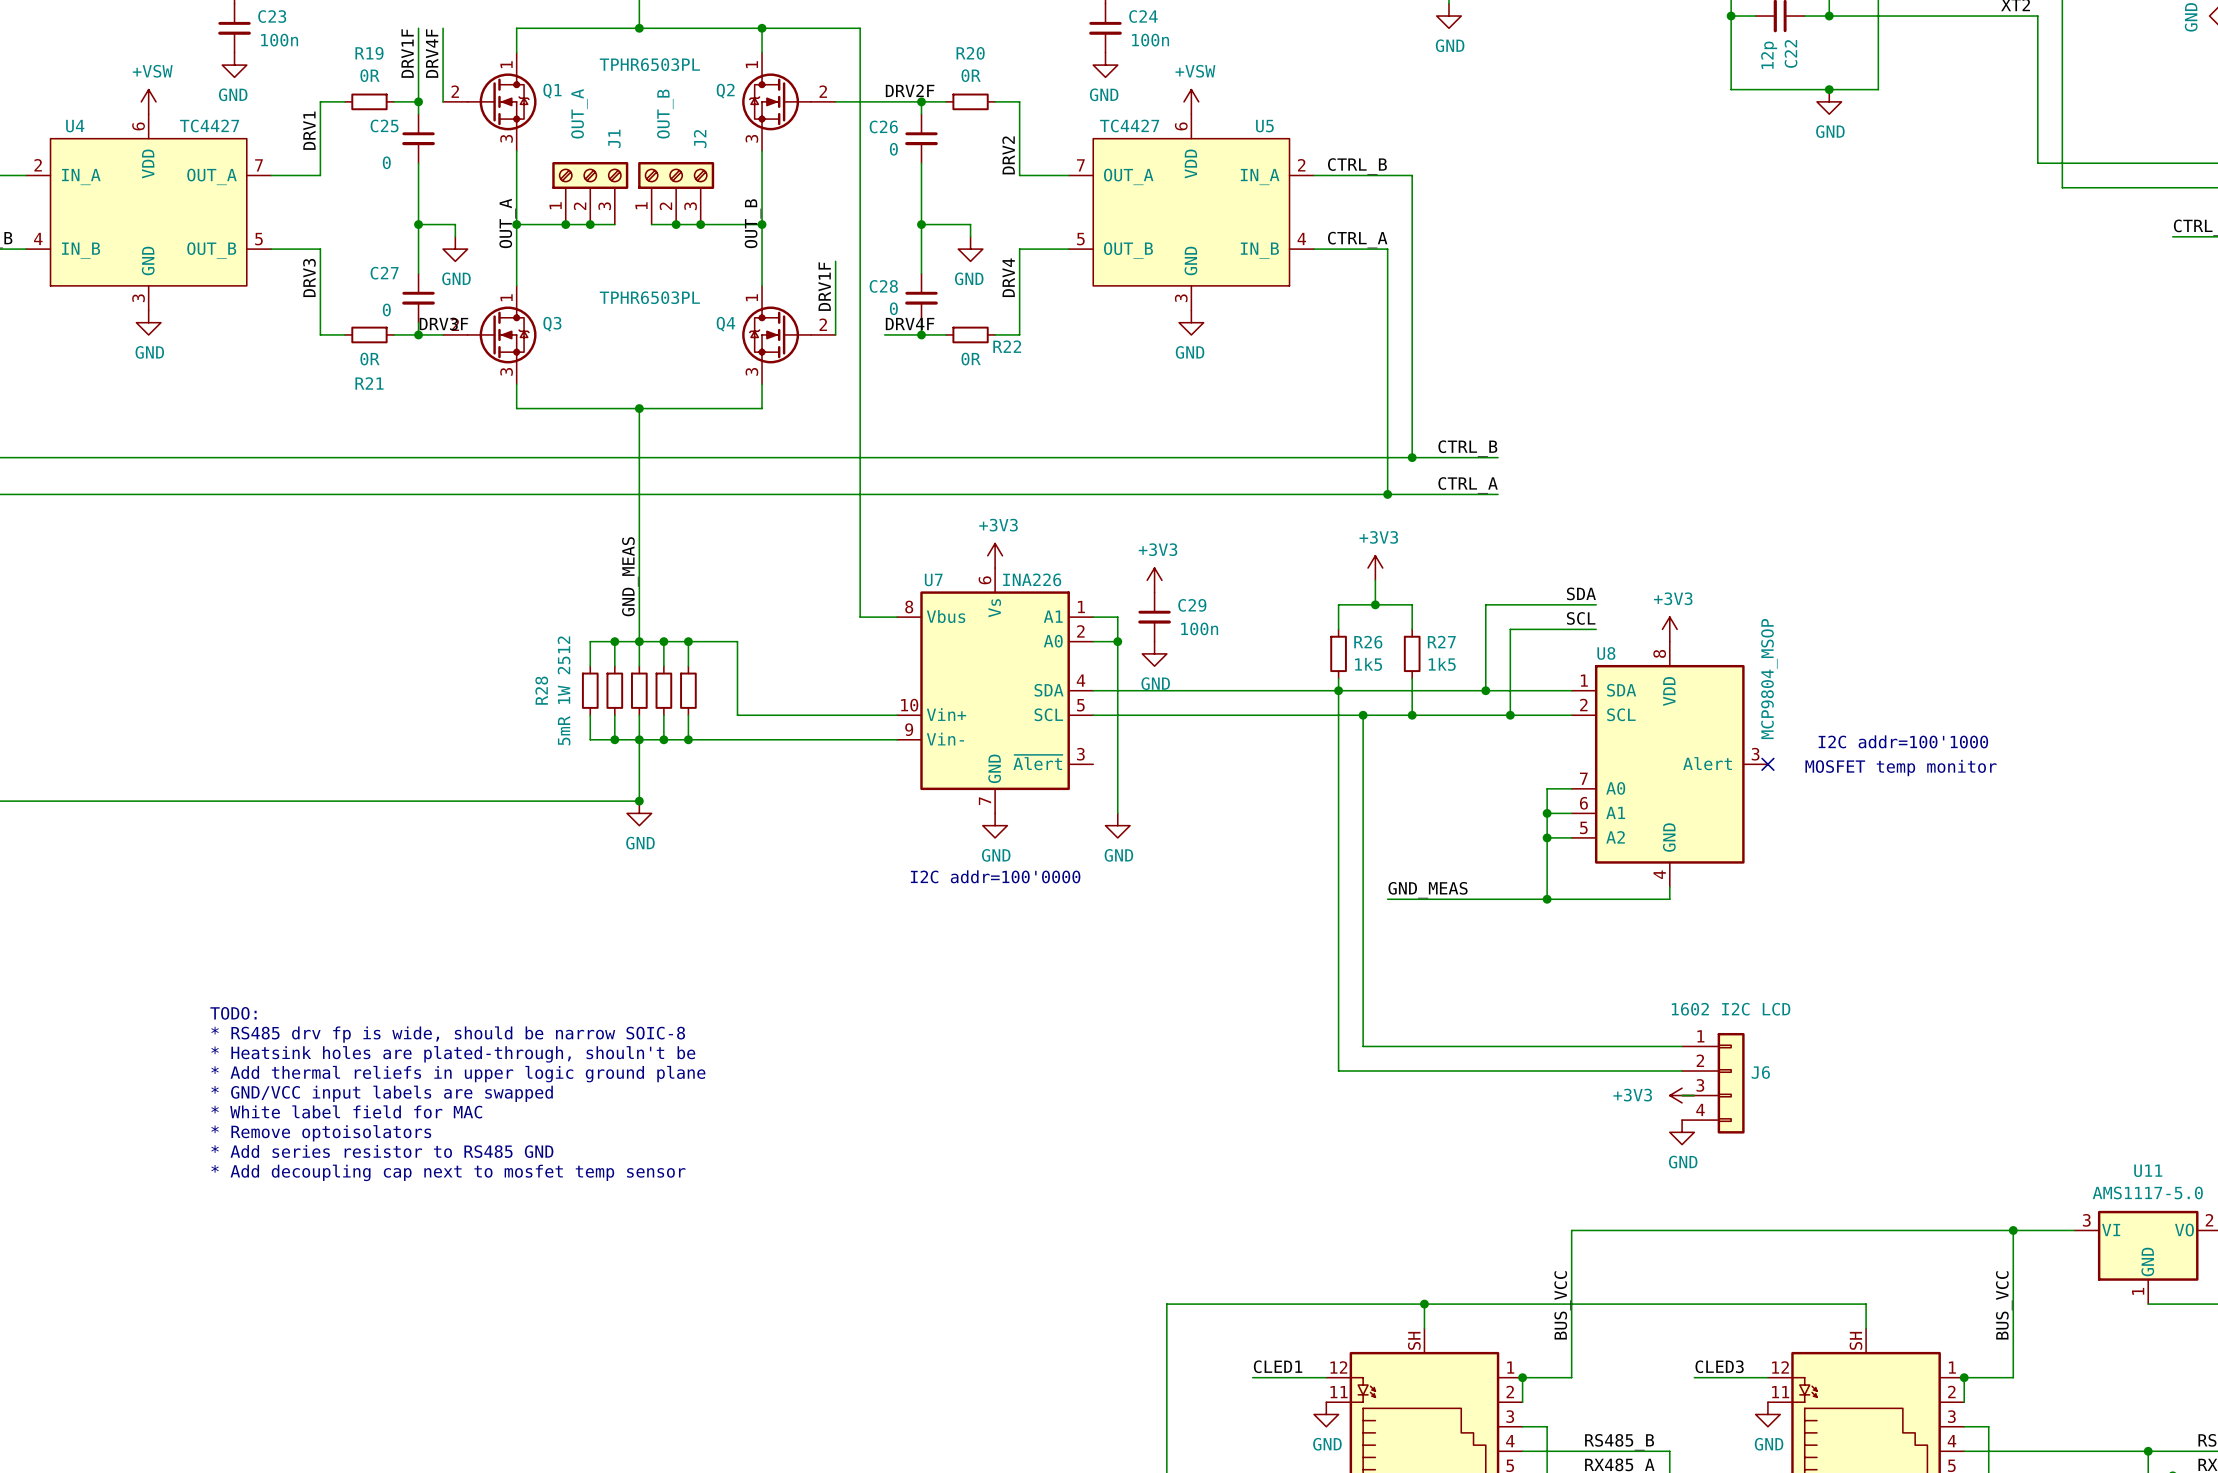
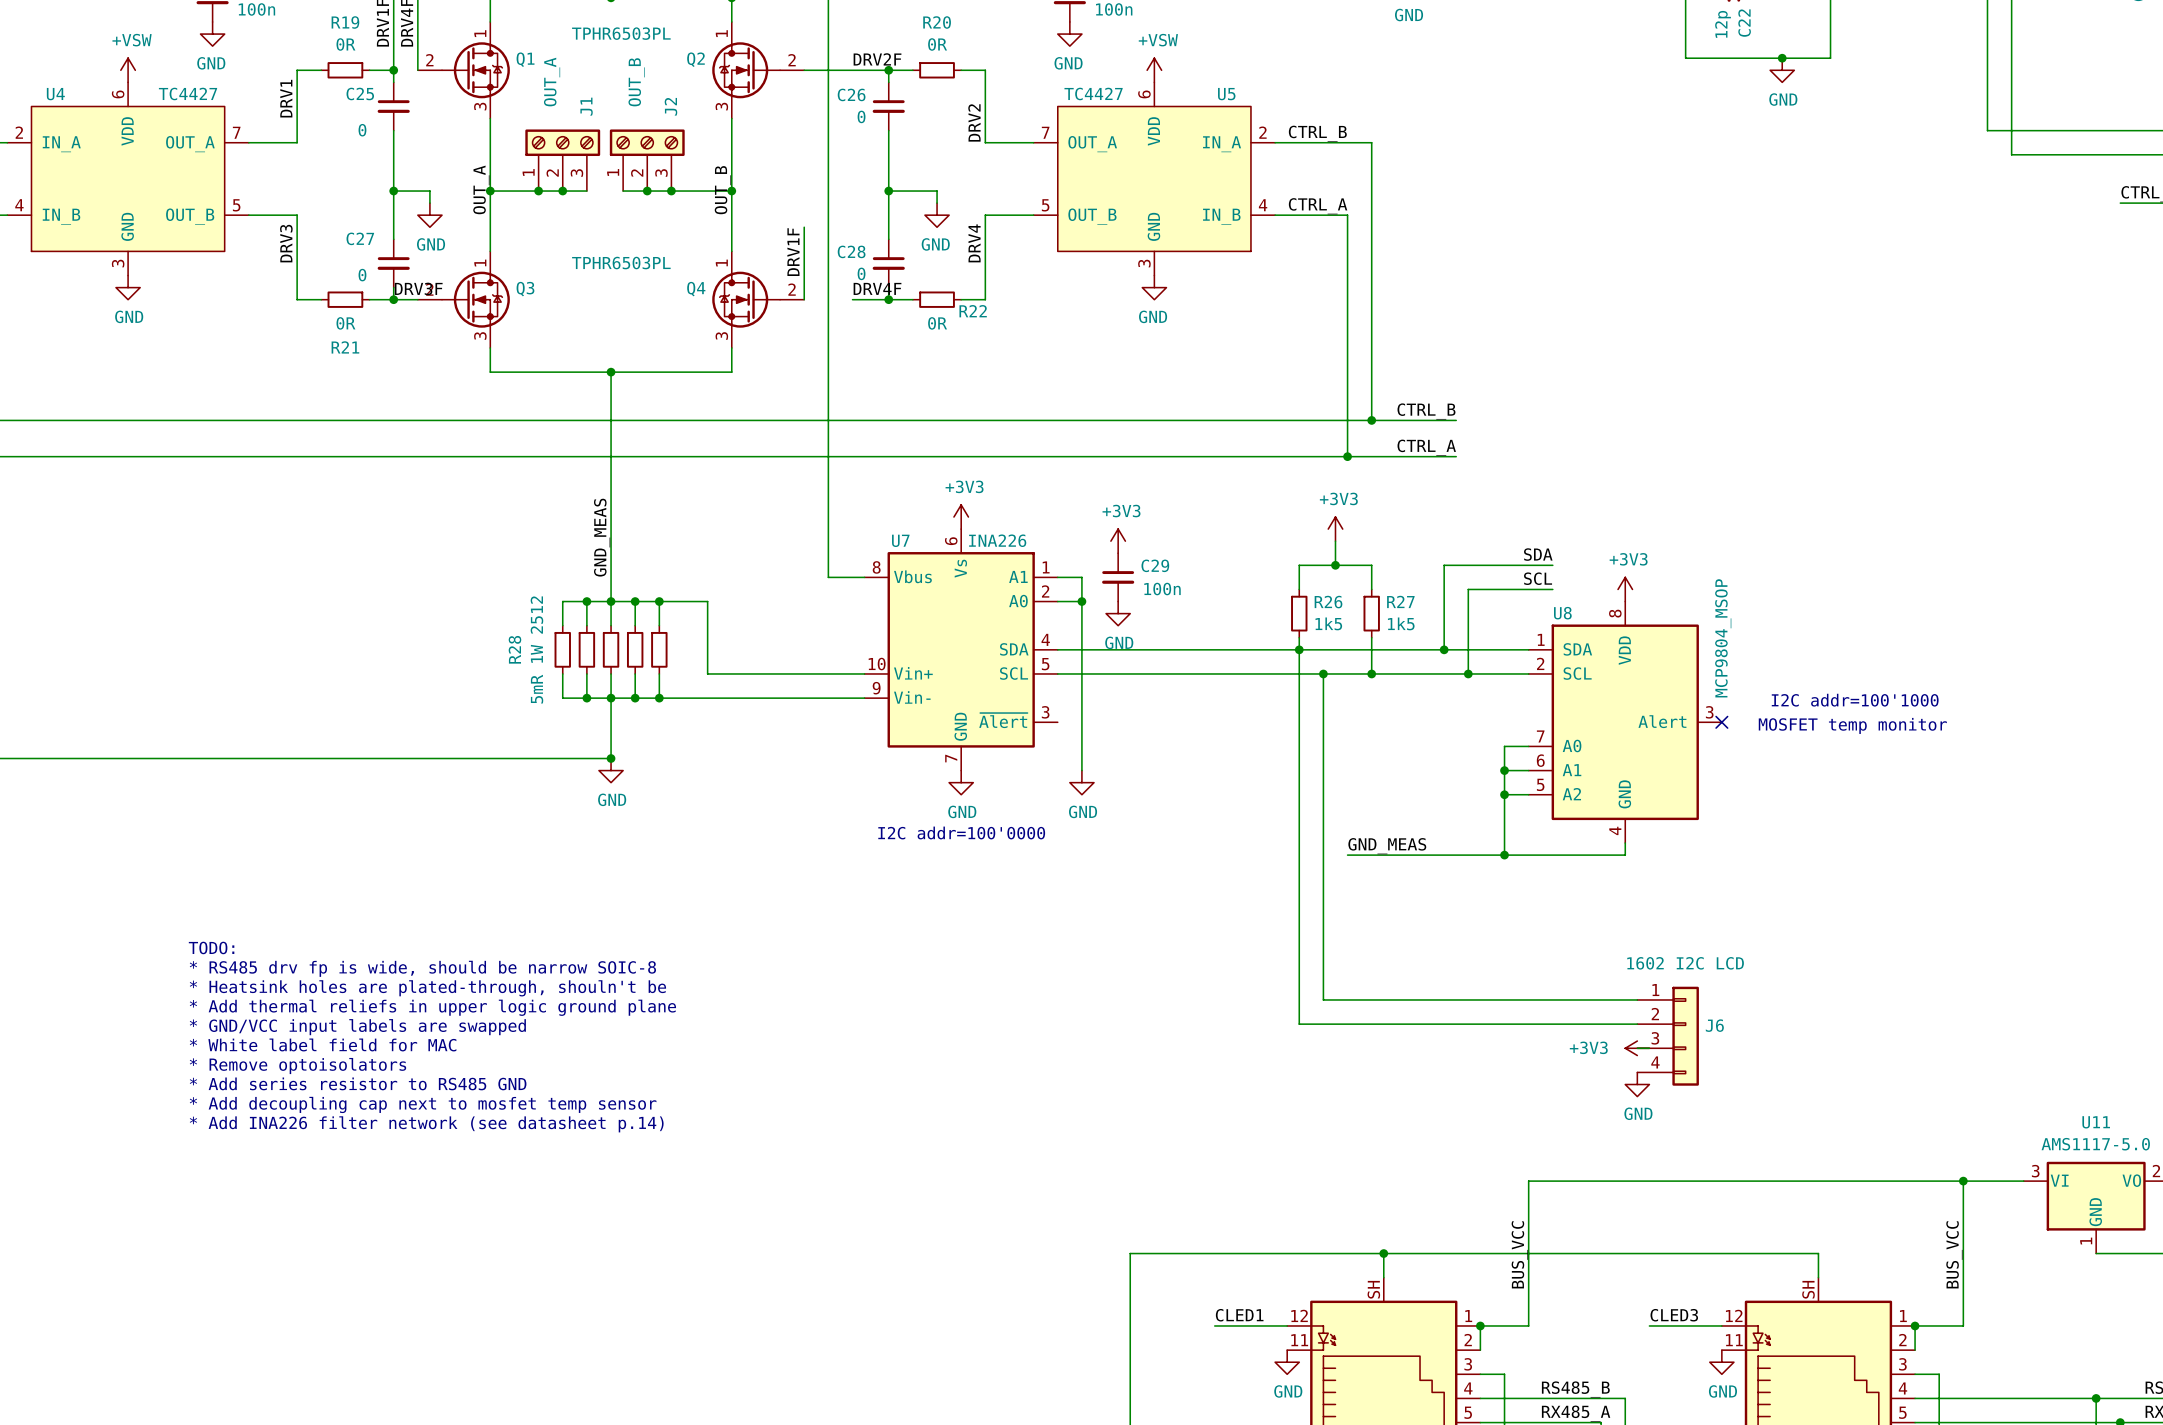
text: none -> TODO: (211, 947)
text: TODO: (233, 1013) -> * RS485 drv fp is wide, should be narrow SOIC-8 (422, 968)
text: * RS485 drv fp is wide, should be narrow SOIC-8 (448, 1034) -> * Heatsink holes are plated-through, shouln't be (427, 988)
text: * Heatsink holes are plated-through, shouln't be (453, 1054) -> * Add thermal reliefs in upper logic ground plane (432, 1007)
text: * Add thermal reliefs in upper logic ground plane (458, 1074) -> * GND/VCC input labels are swapped (357, 1027)
text: * GND/VCC input labels are swapped (382, 1093) -> * White label field for MAC (323, 1044)
text: * White label field for MAC (346, 1111) -> * Remove optoisolators (297, 1066)
text: * Remove optoisolators (321, 1133) -> * Add series resistor to RS485 GND (358, 1083)
text: * Add series resistor to RS485 GND (382, 1151) -> * Add decoupling cap next to mosfet temp sensor (423, 1104)
text: * Add decoupling cap next to mosfet temp sensor (448, 1172) -> * Add INA226 filter network (see datasheet p.14) (426, 1124)

